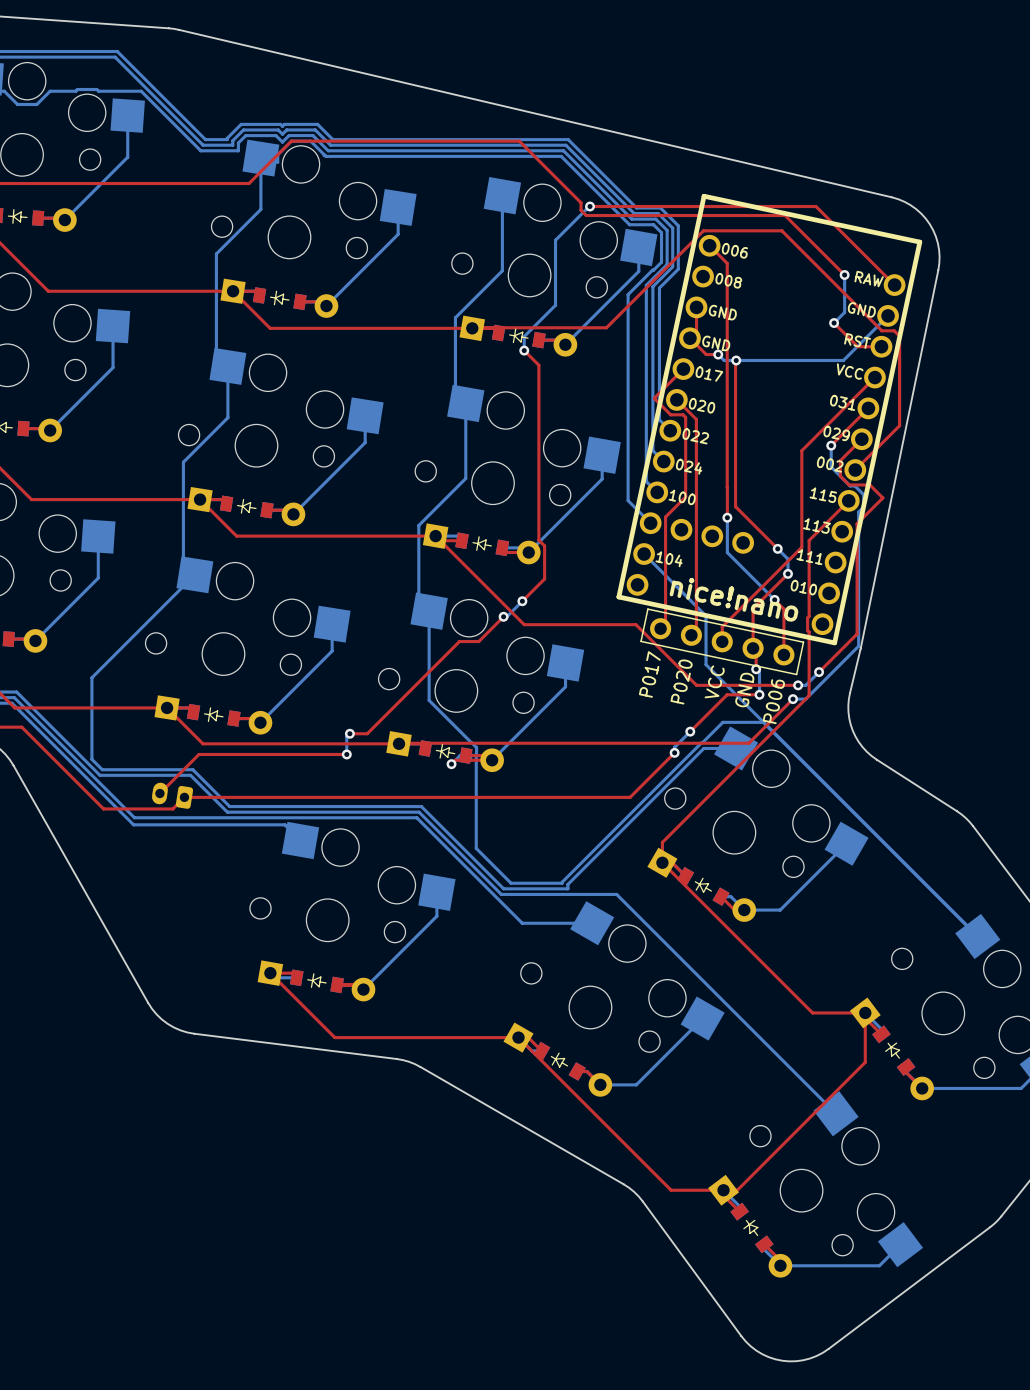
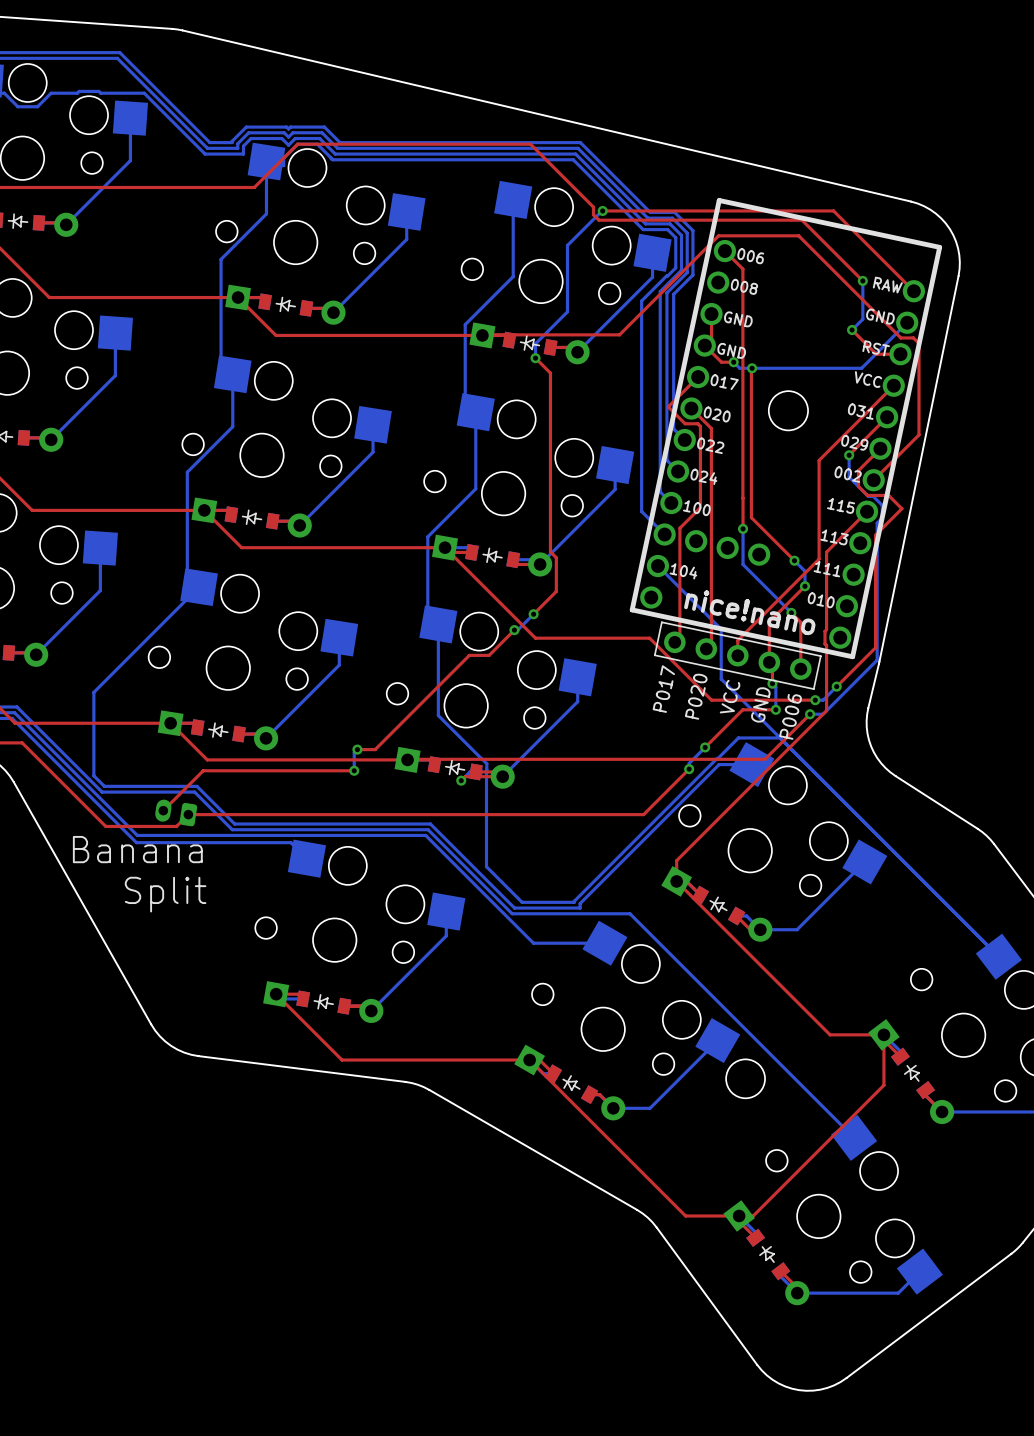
round board edge: none -> [768, 390, 809, 431]
text: none -> Banana (137, 849)
text: none -> Split (165, 894)
round board edge: none -> [725, 1059, 766, 1099]

